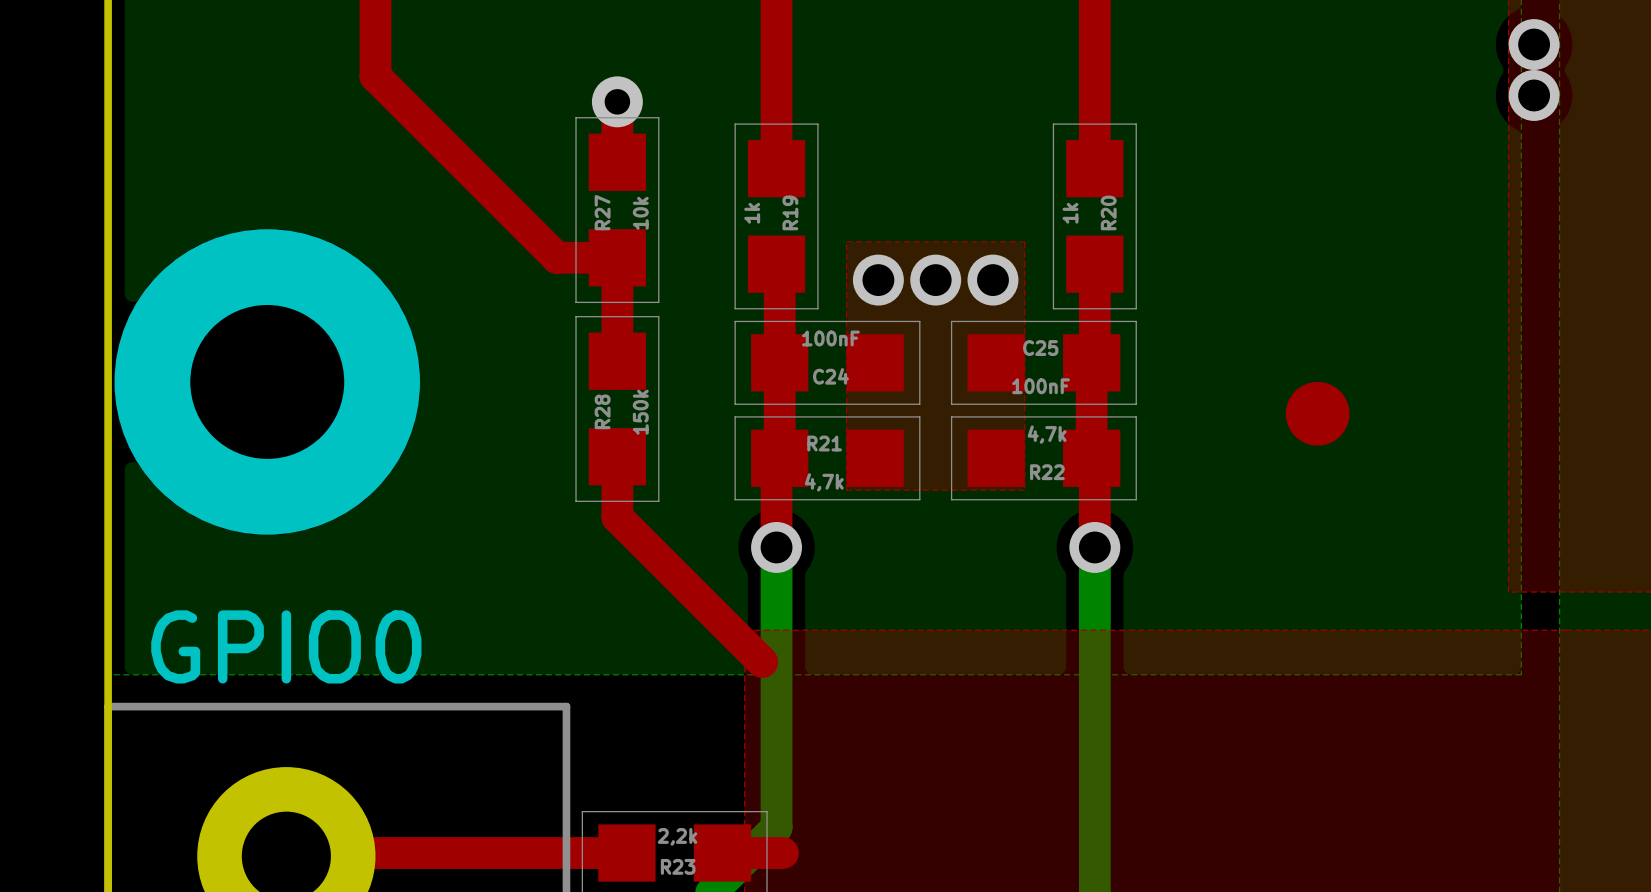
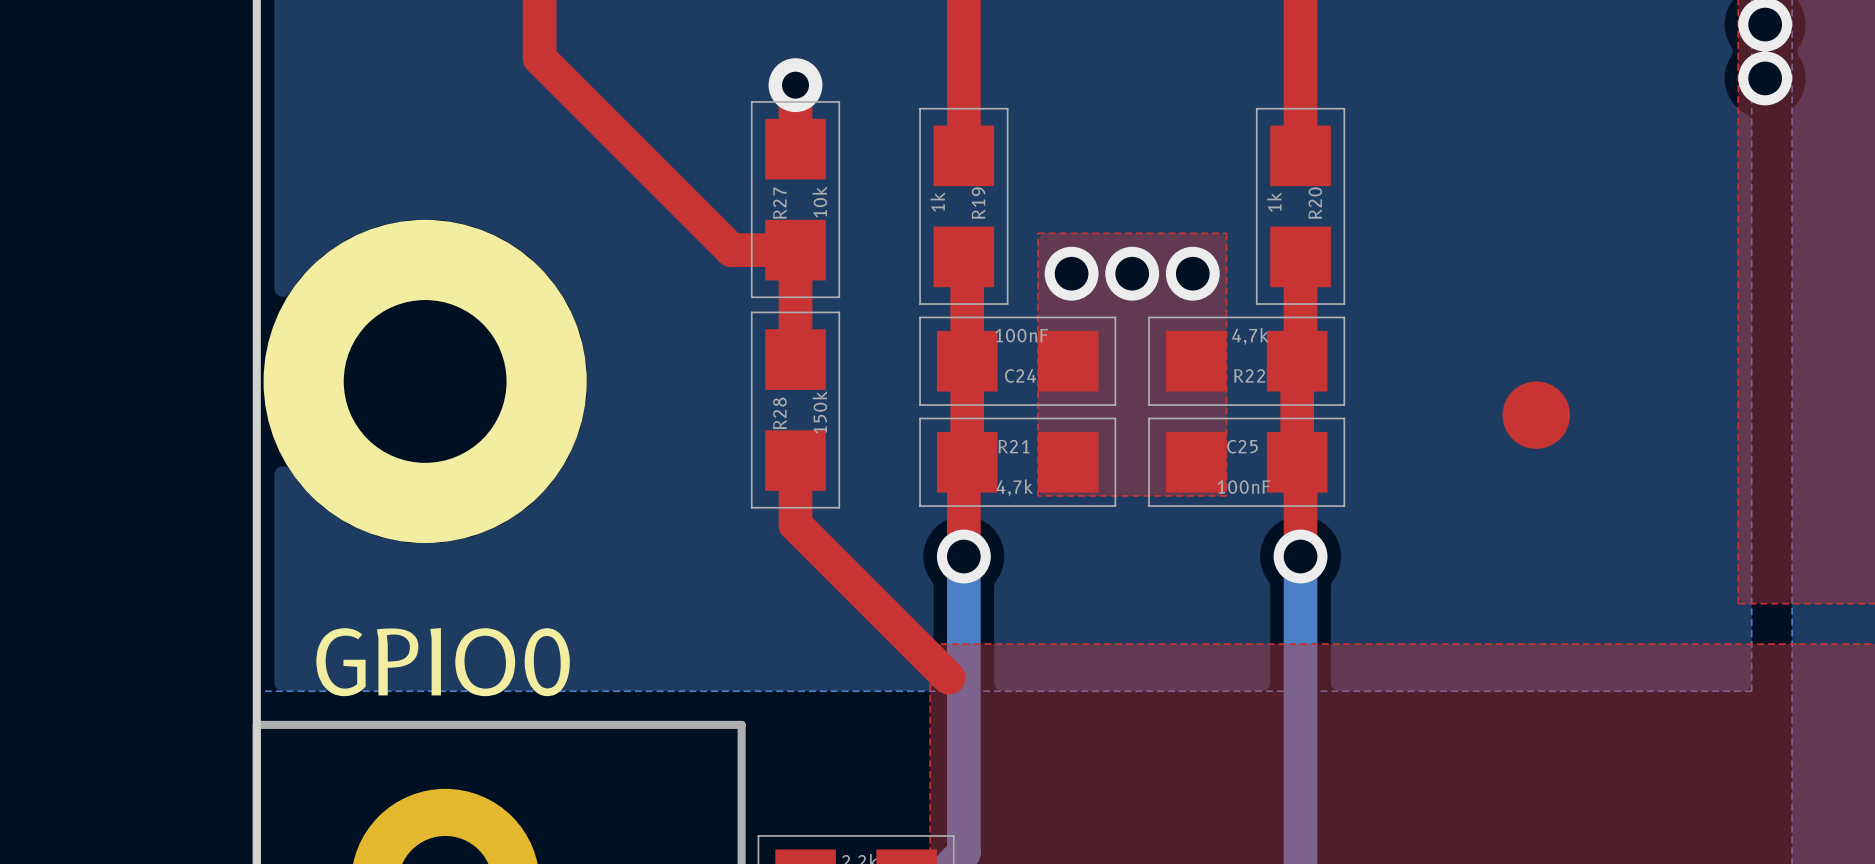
C25 name: C25 (1040, 348) -> R22 (1249, 375)
C25 value: 100nF (1041, 386) -> 4,7k (1250, 336)
R22 value: 4,7k (1047, 434) -> 100nF (1243, 487)
R22 name: R22 (1047, 472) -> C25 (1242, 446)

